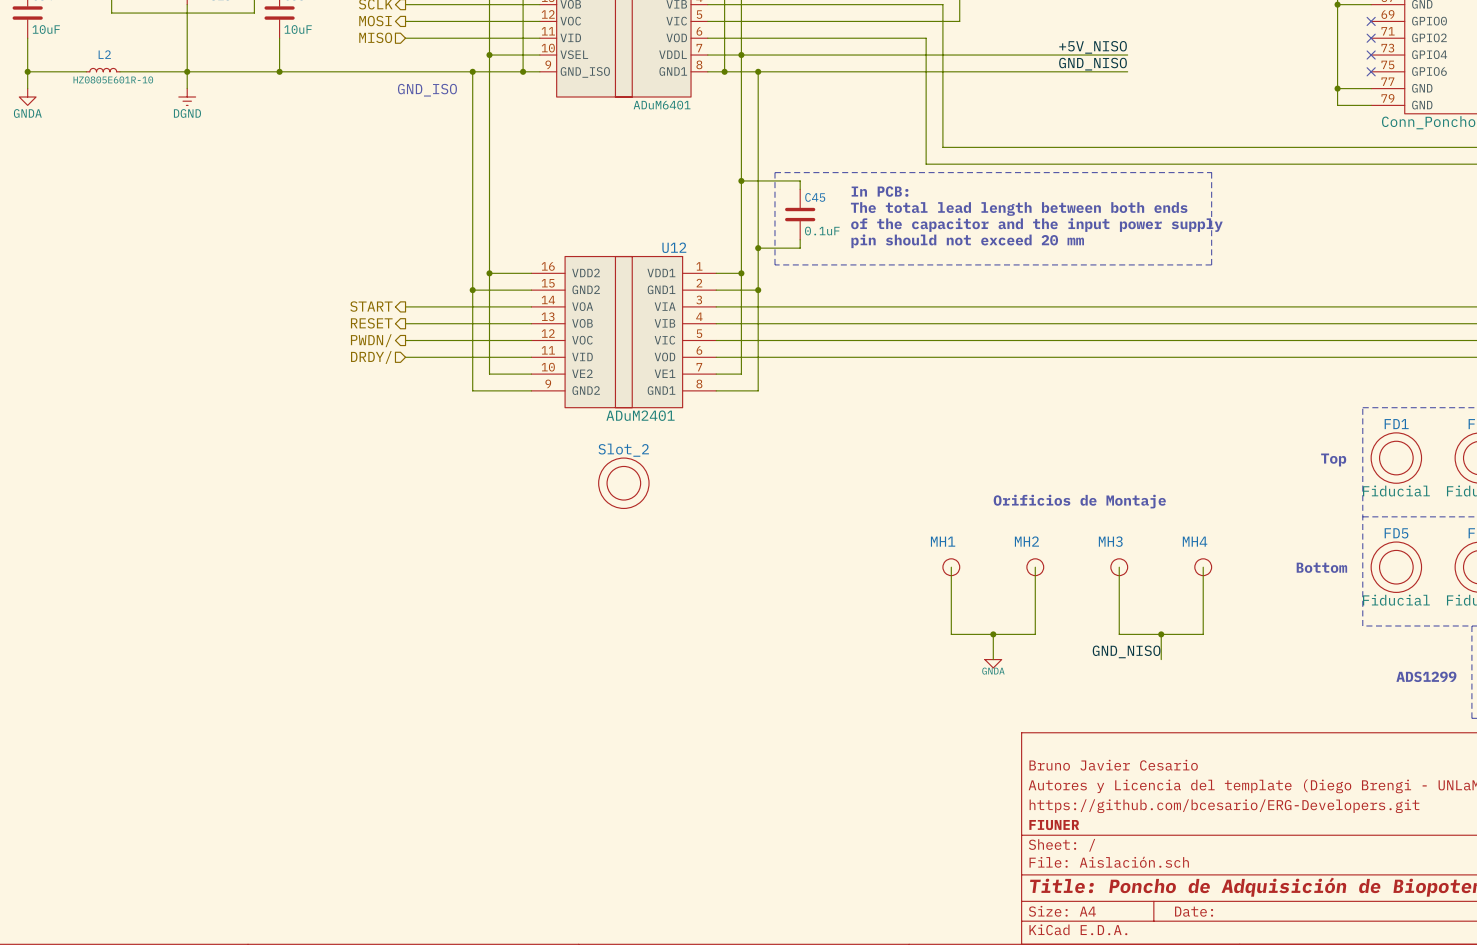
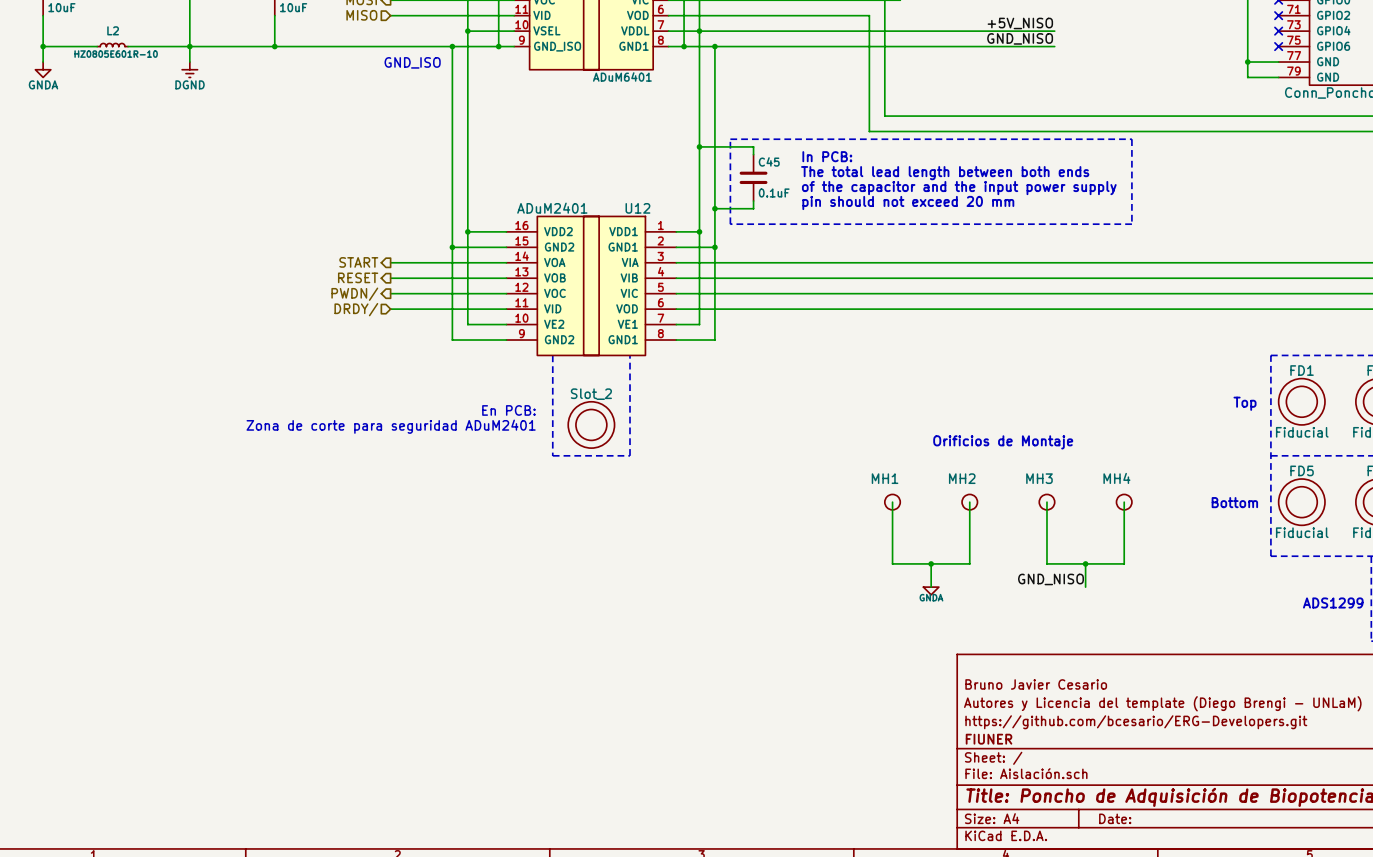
line: none -> (552, 355) (552, 455) (629, 455) (629, 355)
U12 value position: ADuM2401 (640, 415) -> ADuM2401 (552, 208)
text: none -> En PCB: (508, 410)
text: none -> Zona de corte para seguridad ADuM2401 (391, 426)

